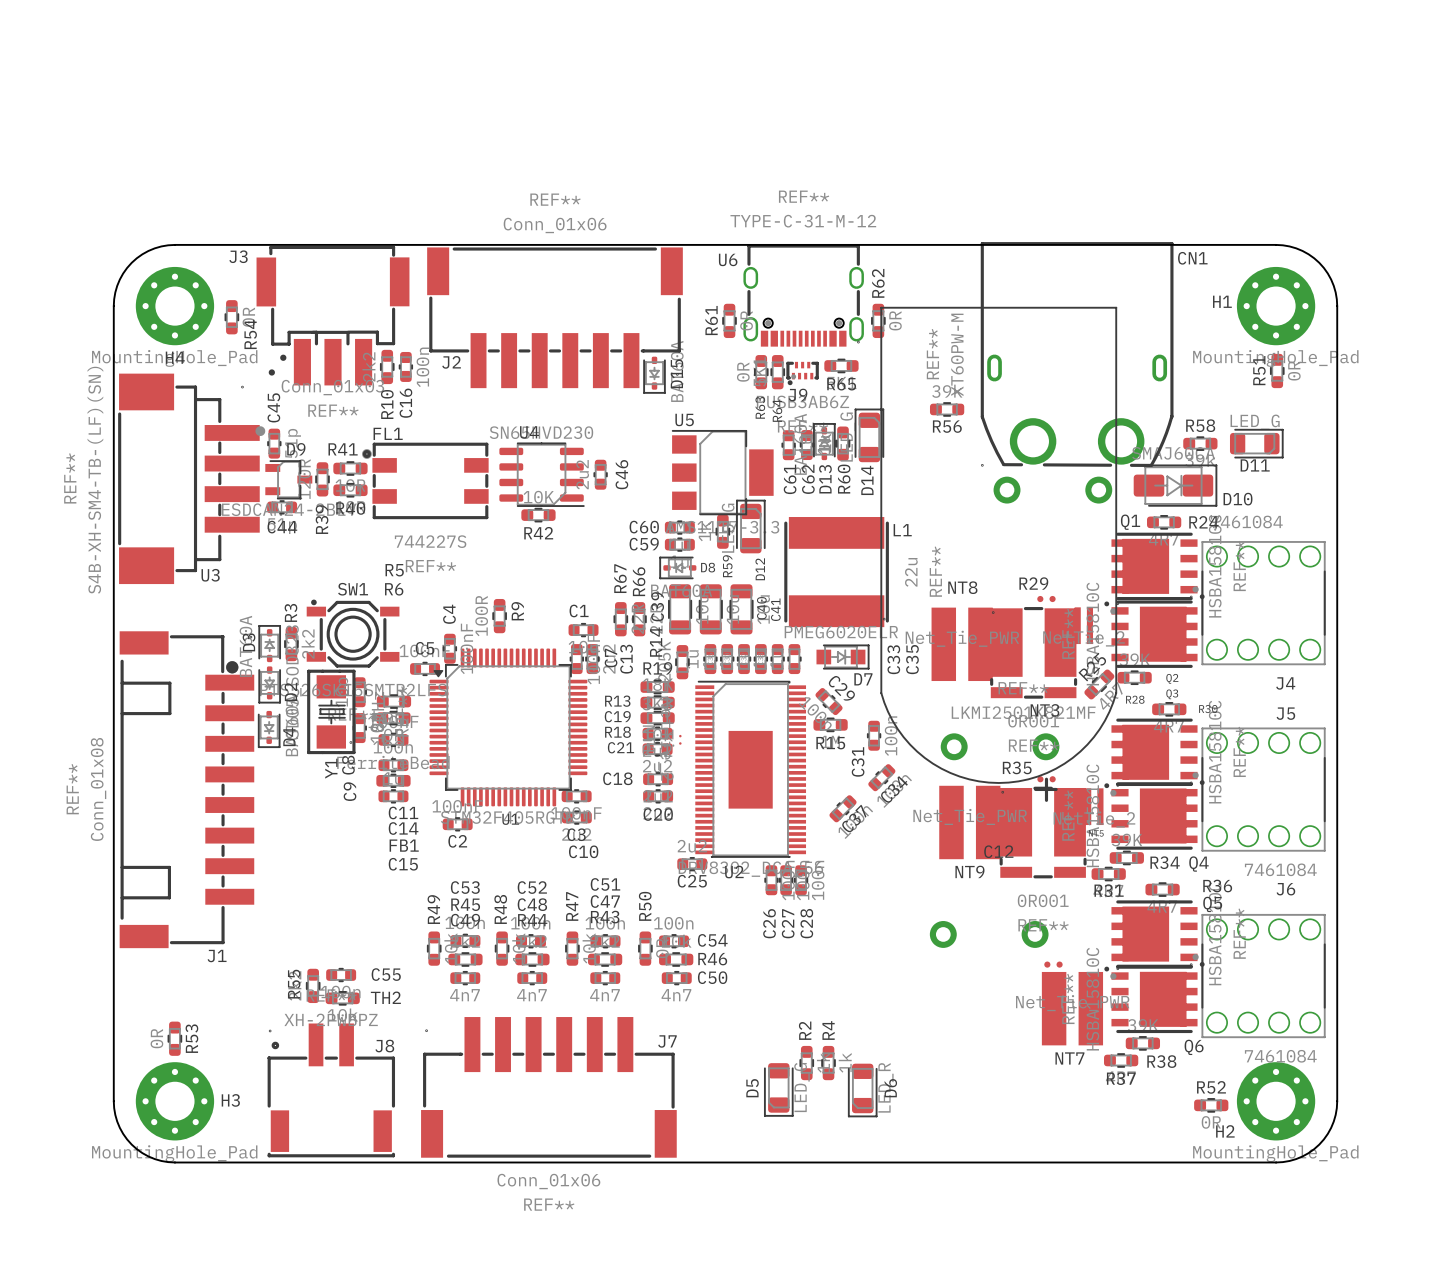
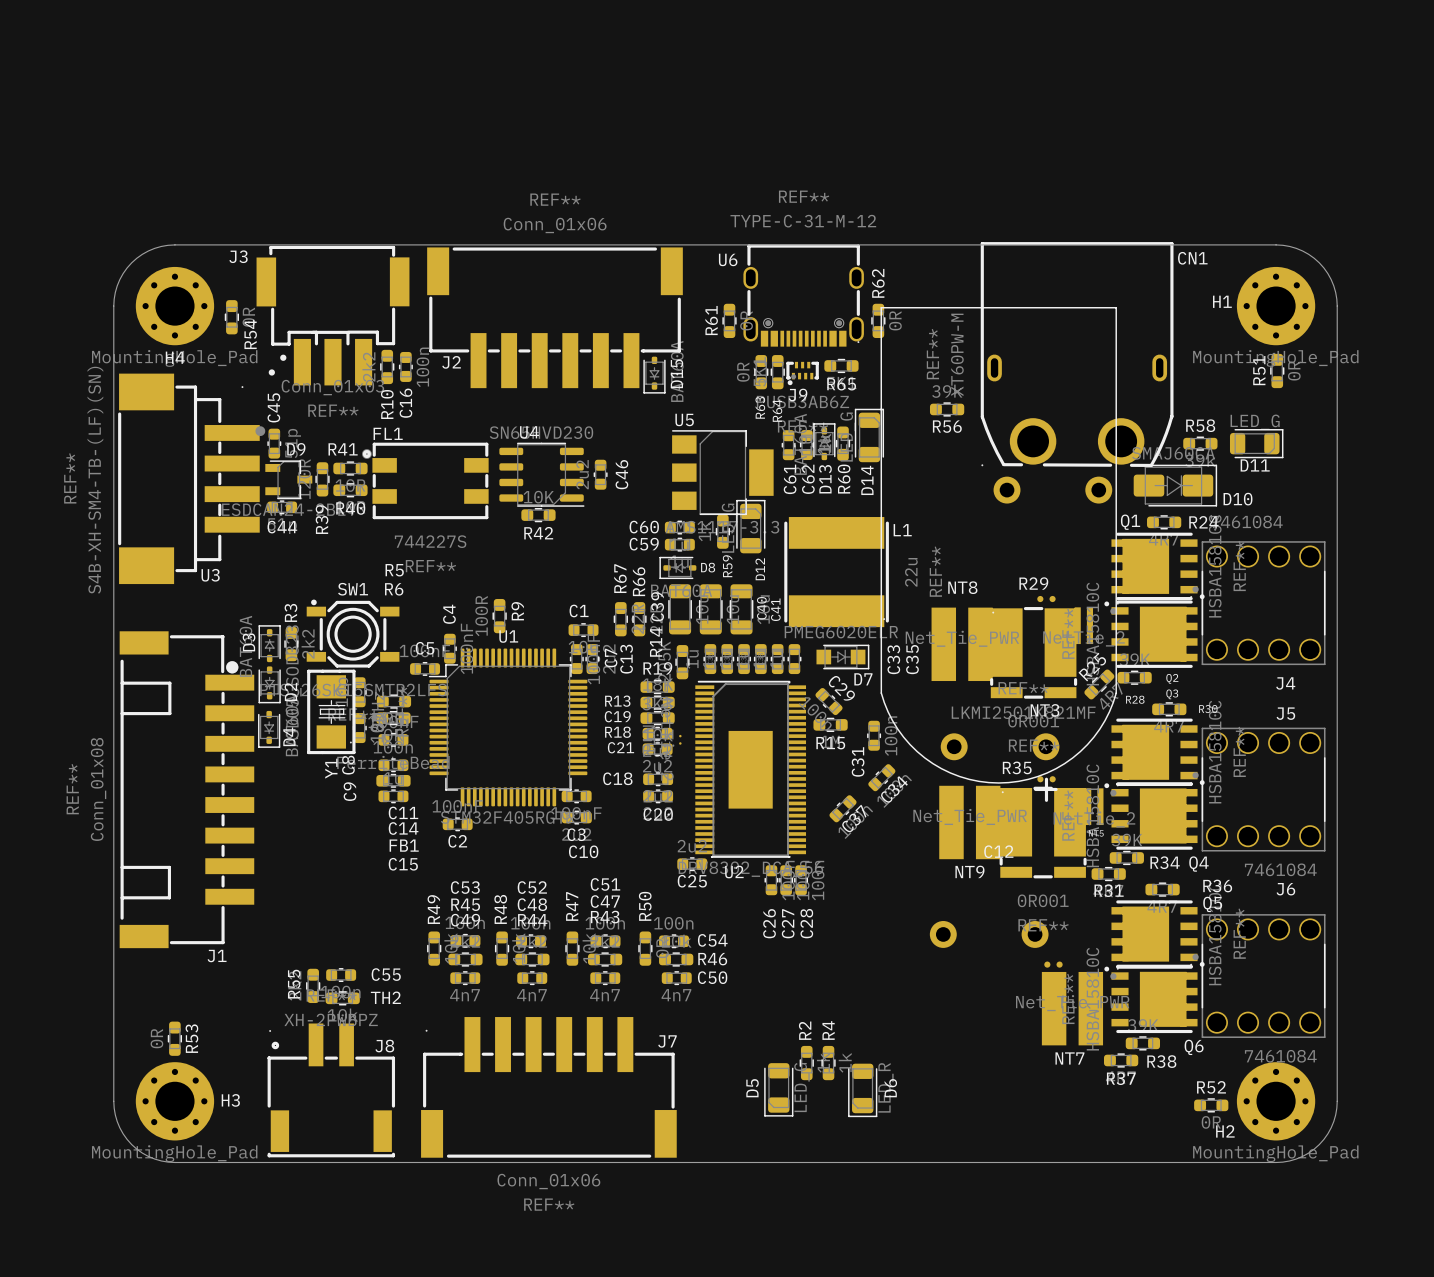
U1 footprint: [429, 648, 588, 807] -> [428, 648, 588, 807]
U1 name position: U1 (510, 819) -> U1 (508, 636)

